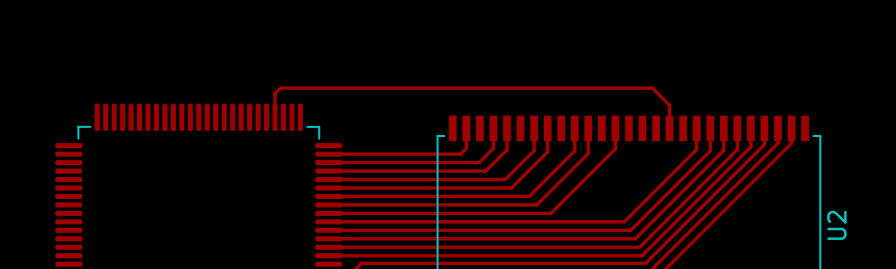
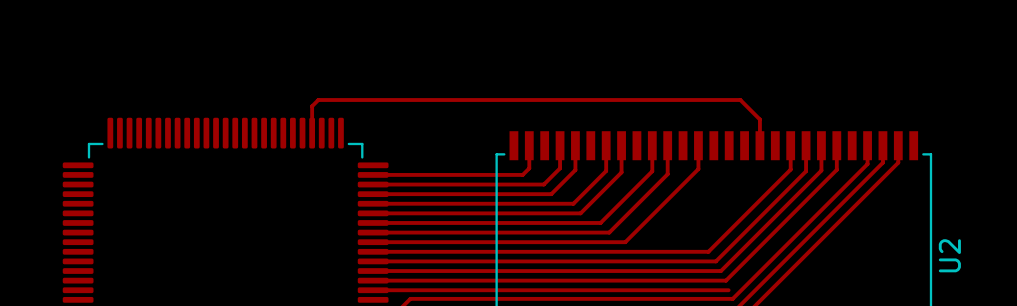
top track: (750, 128) (750, 146) (641, 255) -> none

